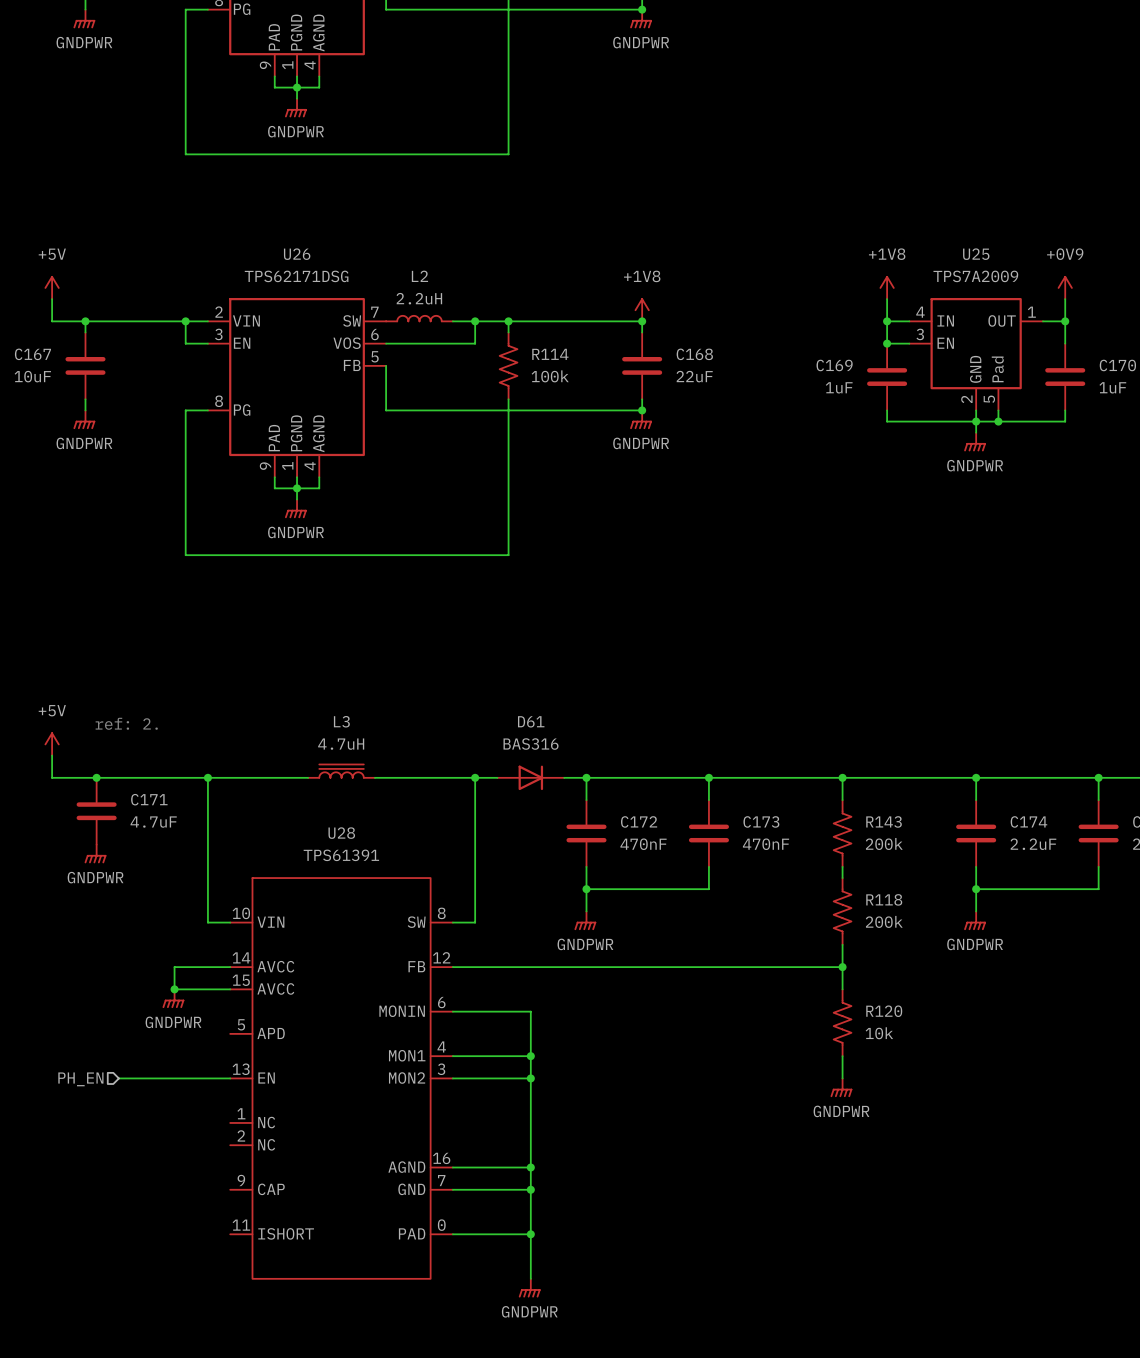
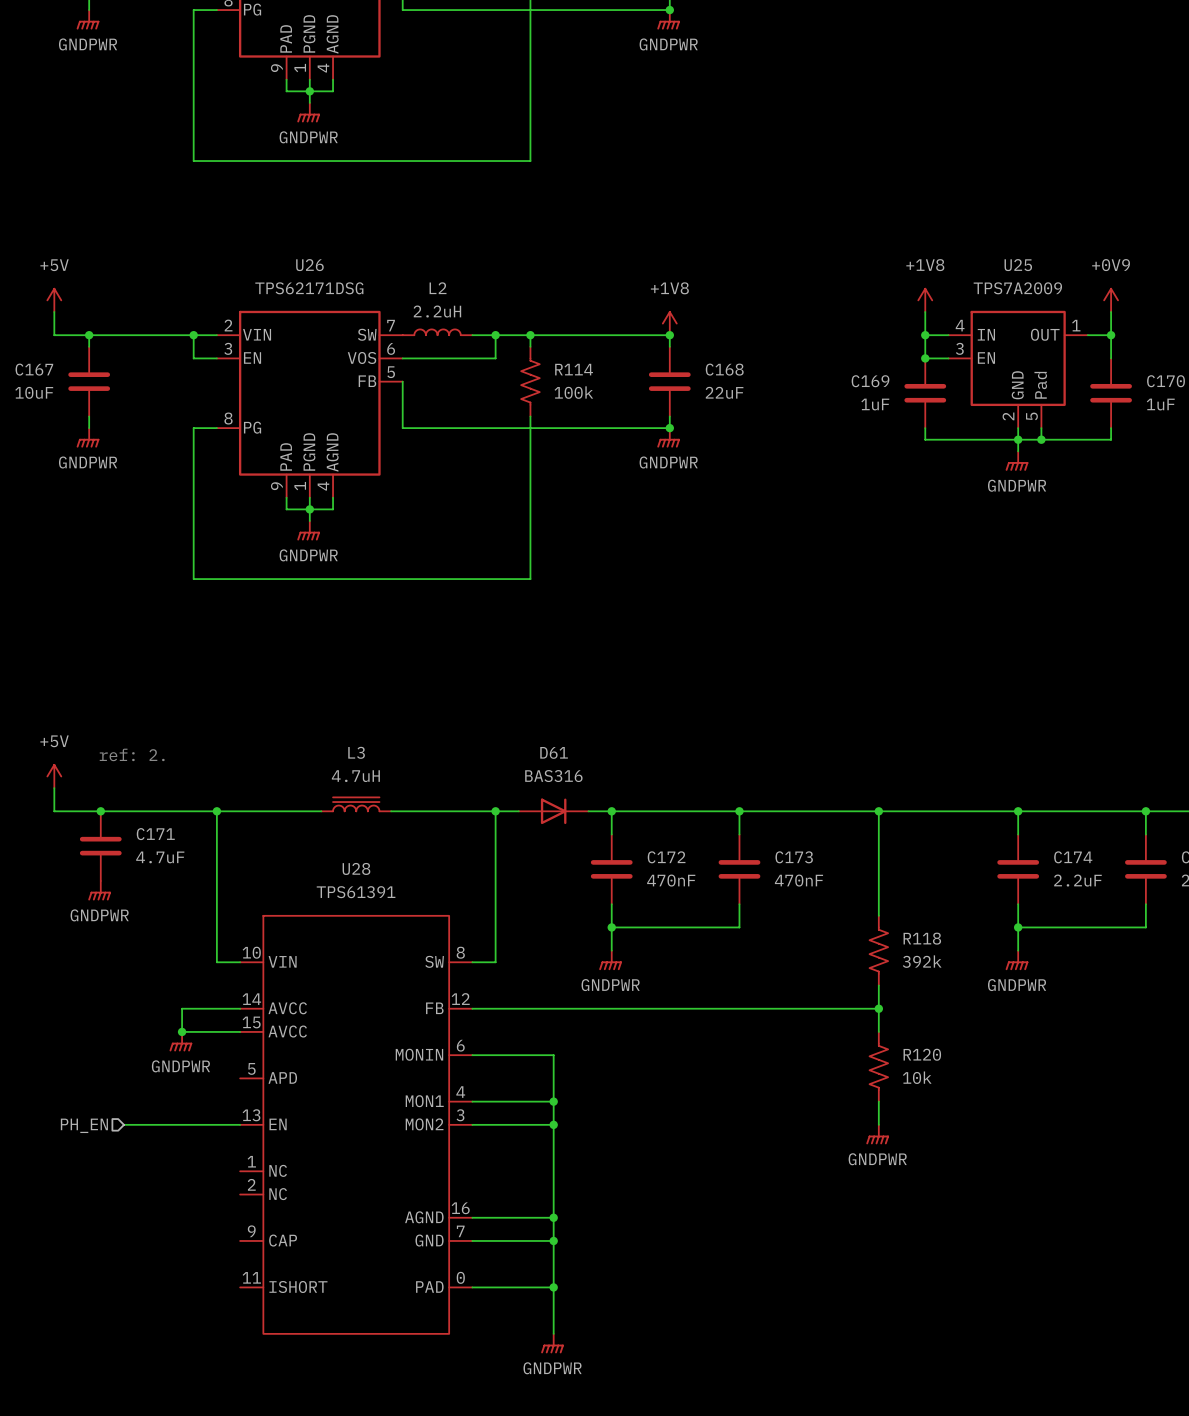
R143: 200k (842, 833) -> none
R118 value: 200k (884, 921) -> 392k (922, 961)

